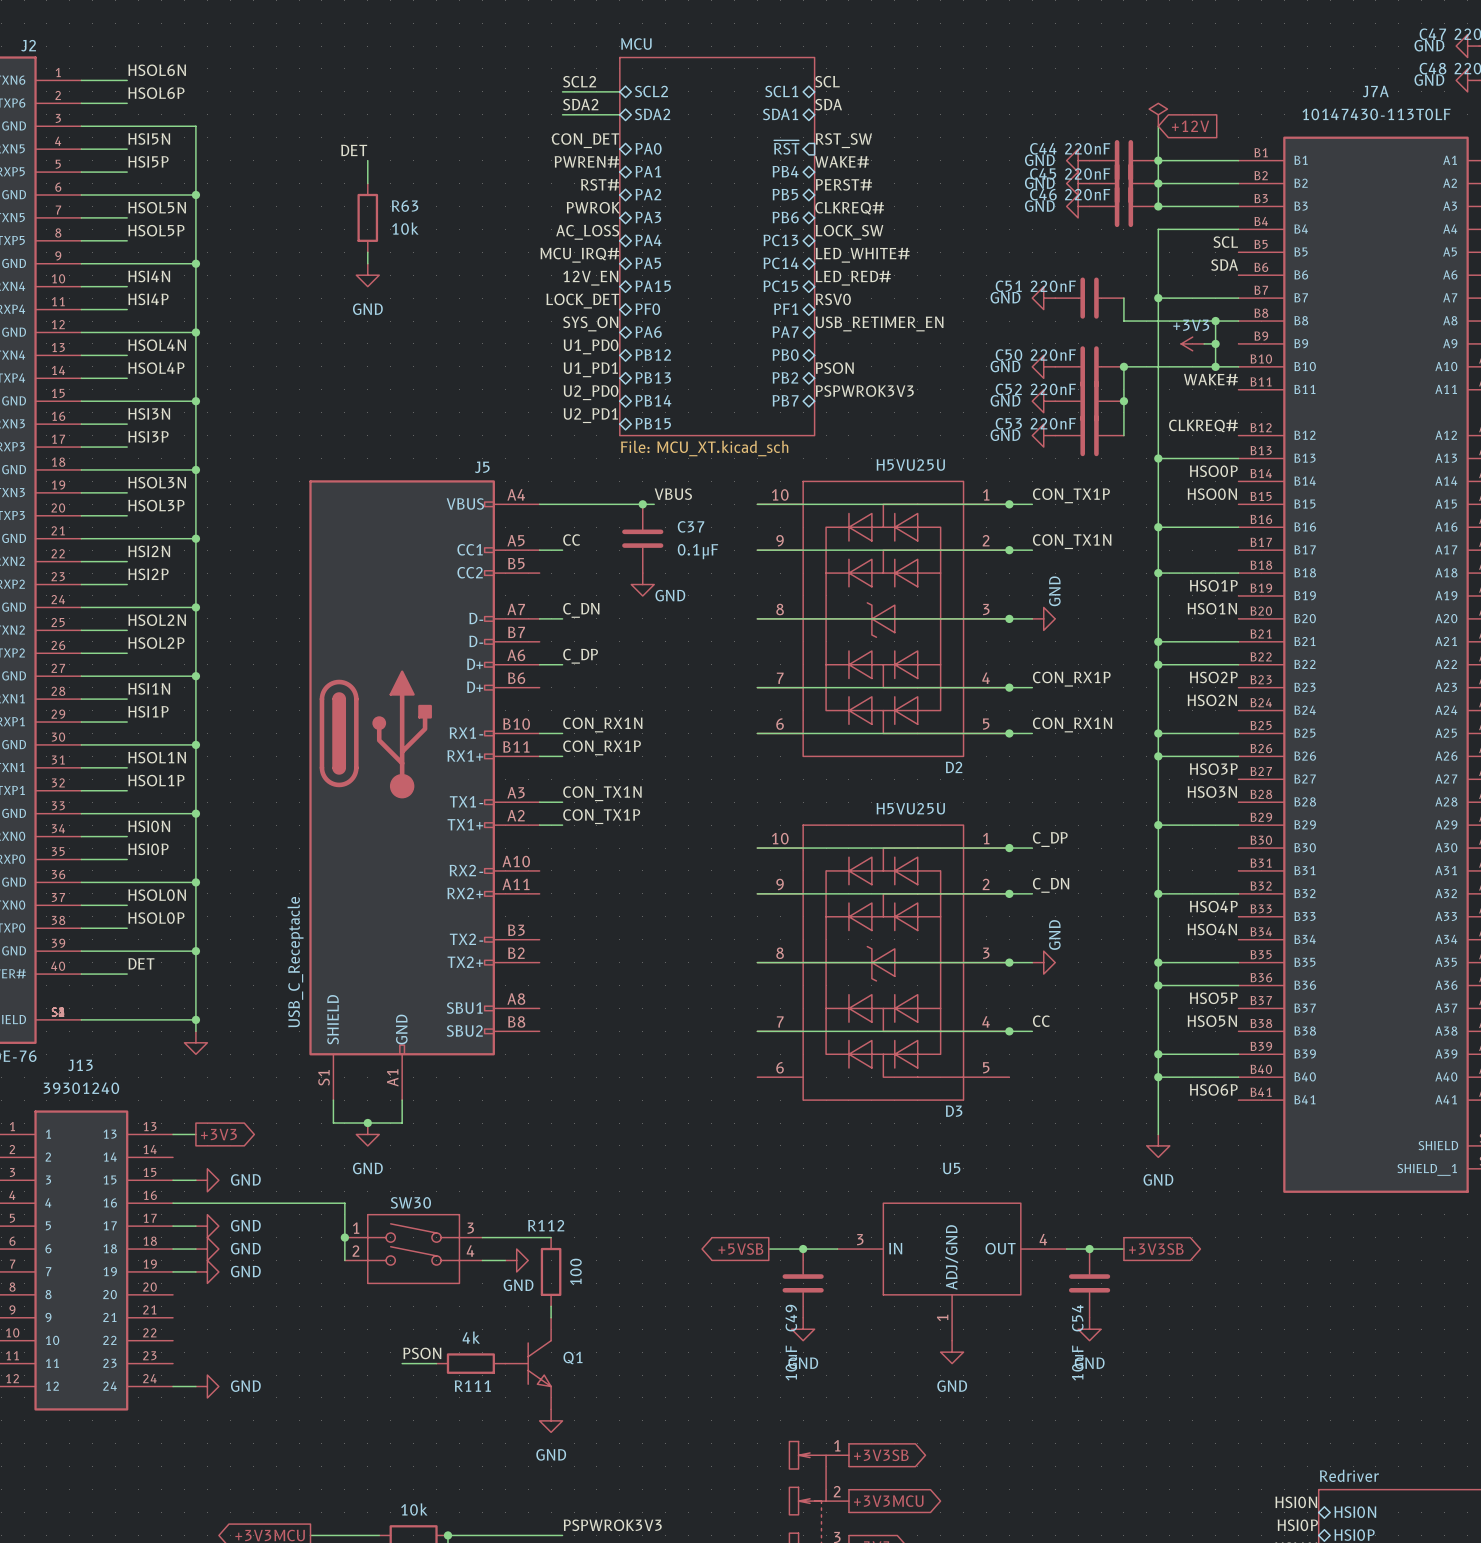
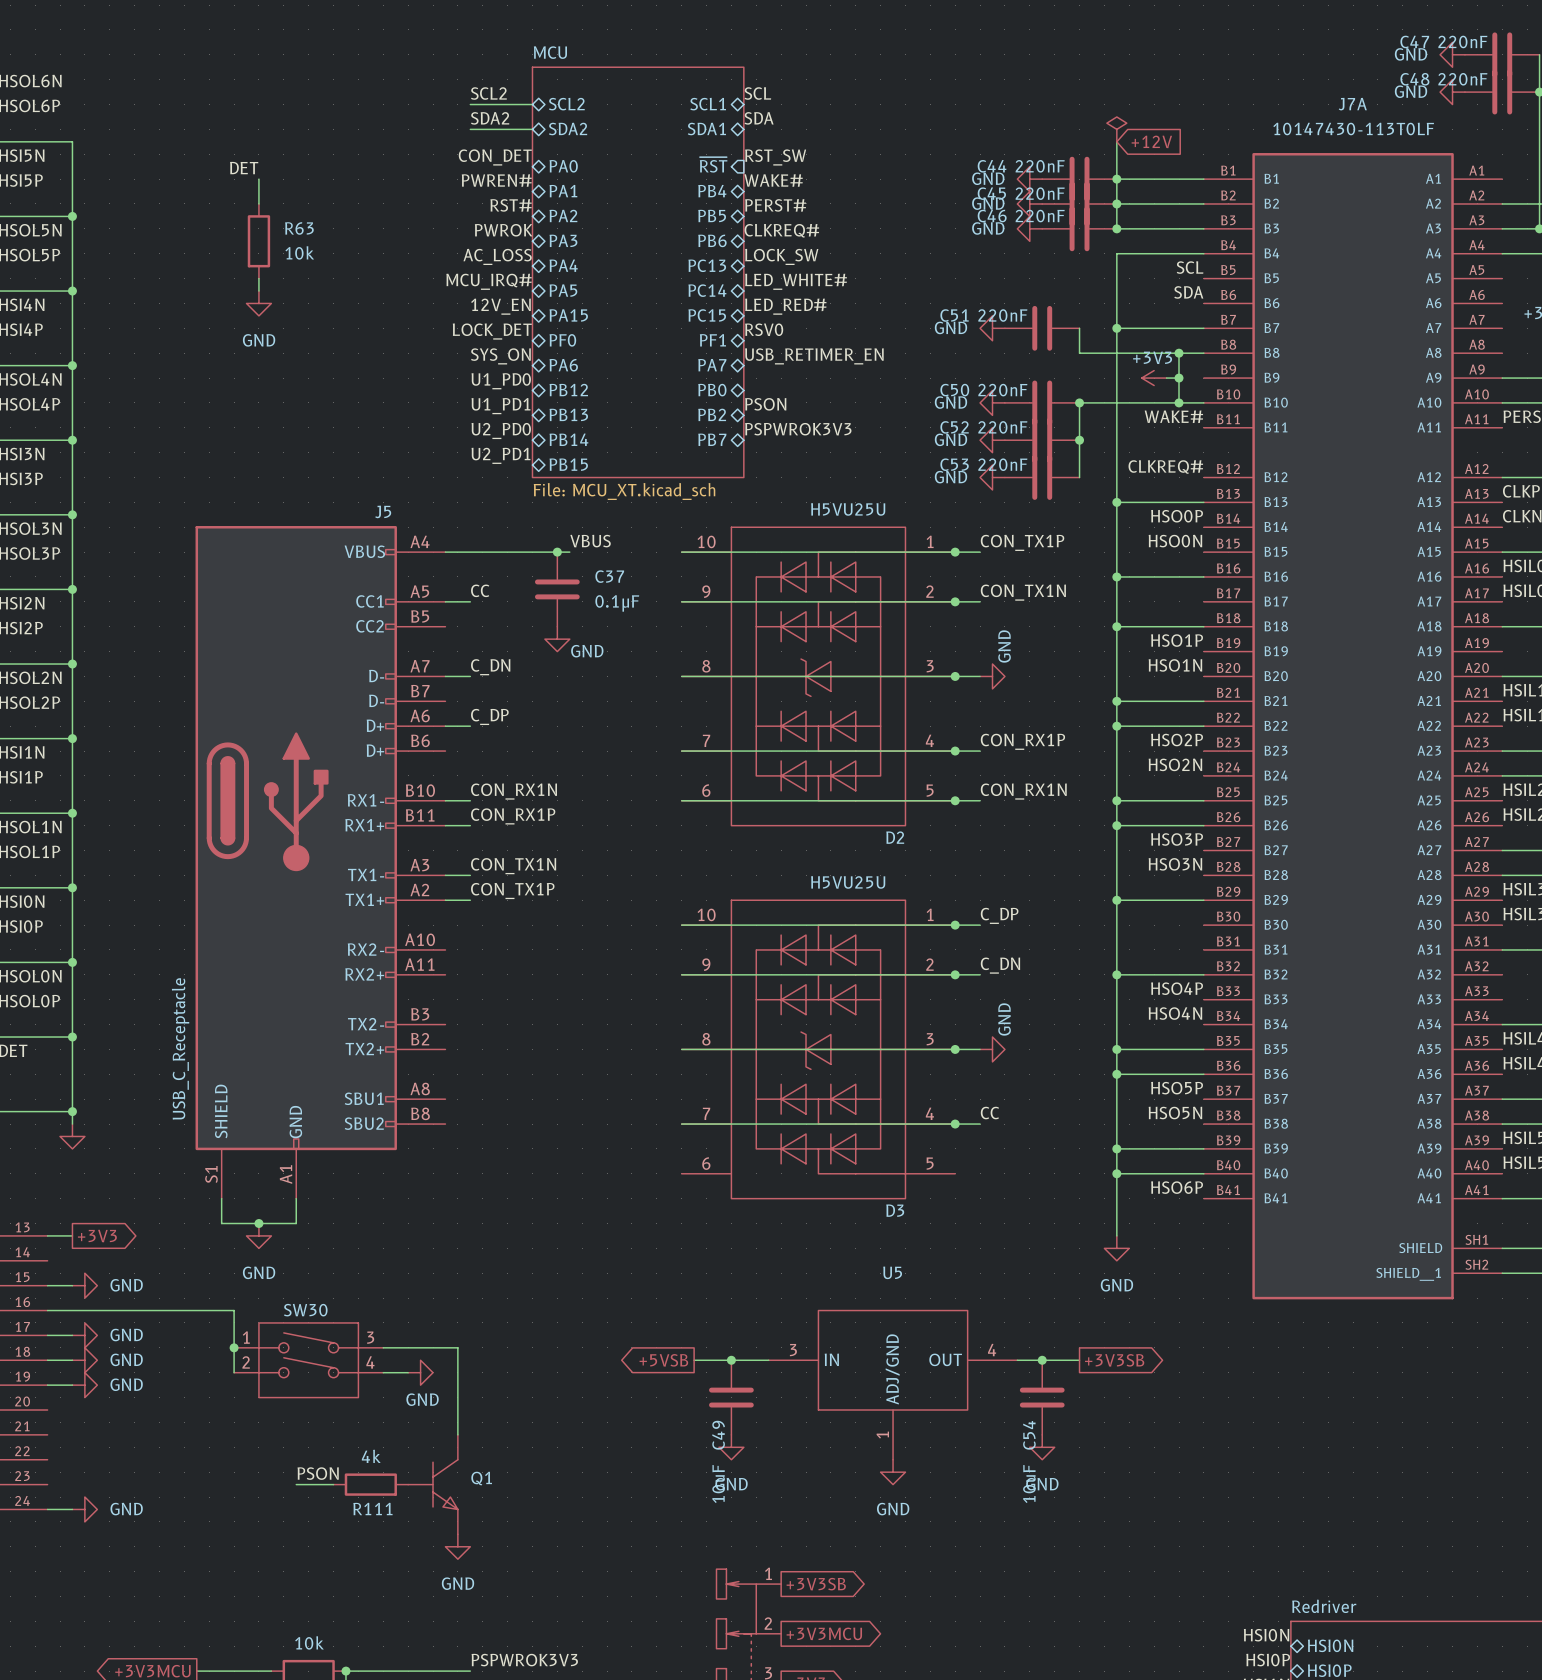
wire: none -> (457, 1347) (457, 1422)
R112: 100 (551, 1271) -> none

